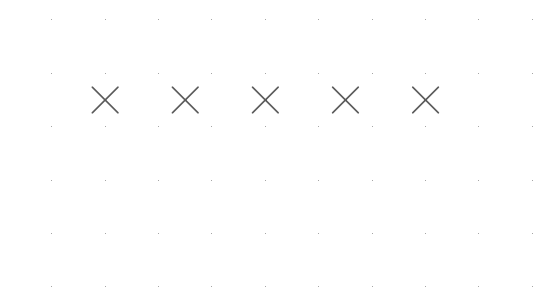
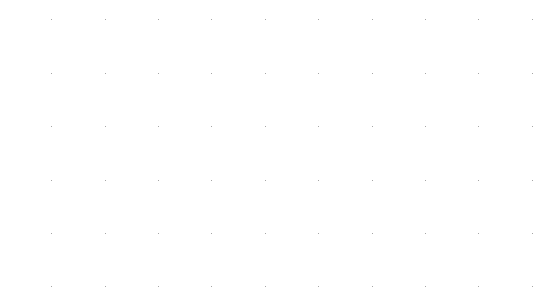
no-connect mark: (105, 99) -> none
no-connect mark: (185, 99) -> none
no-connect mark: (265, 99) -> none
no-connect mark: (345, 99) -> none
no-connect mark: (425, 99) -> none

